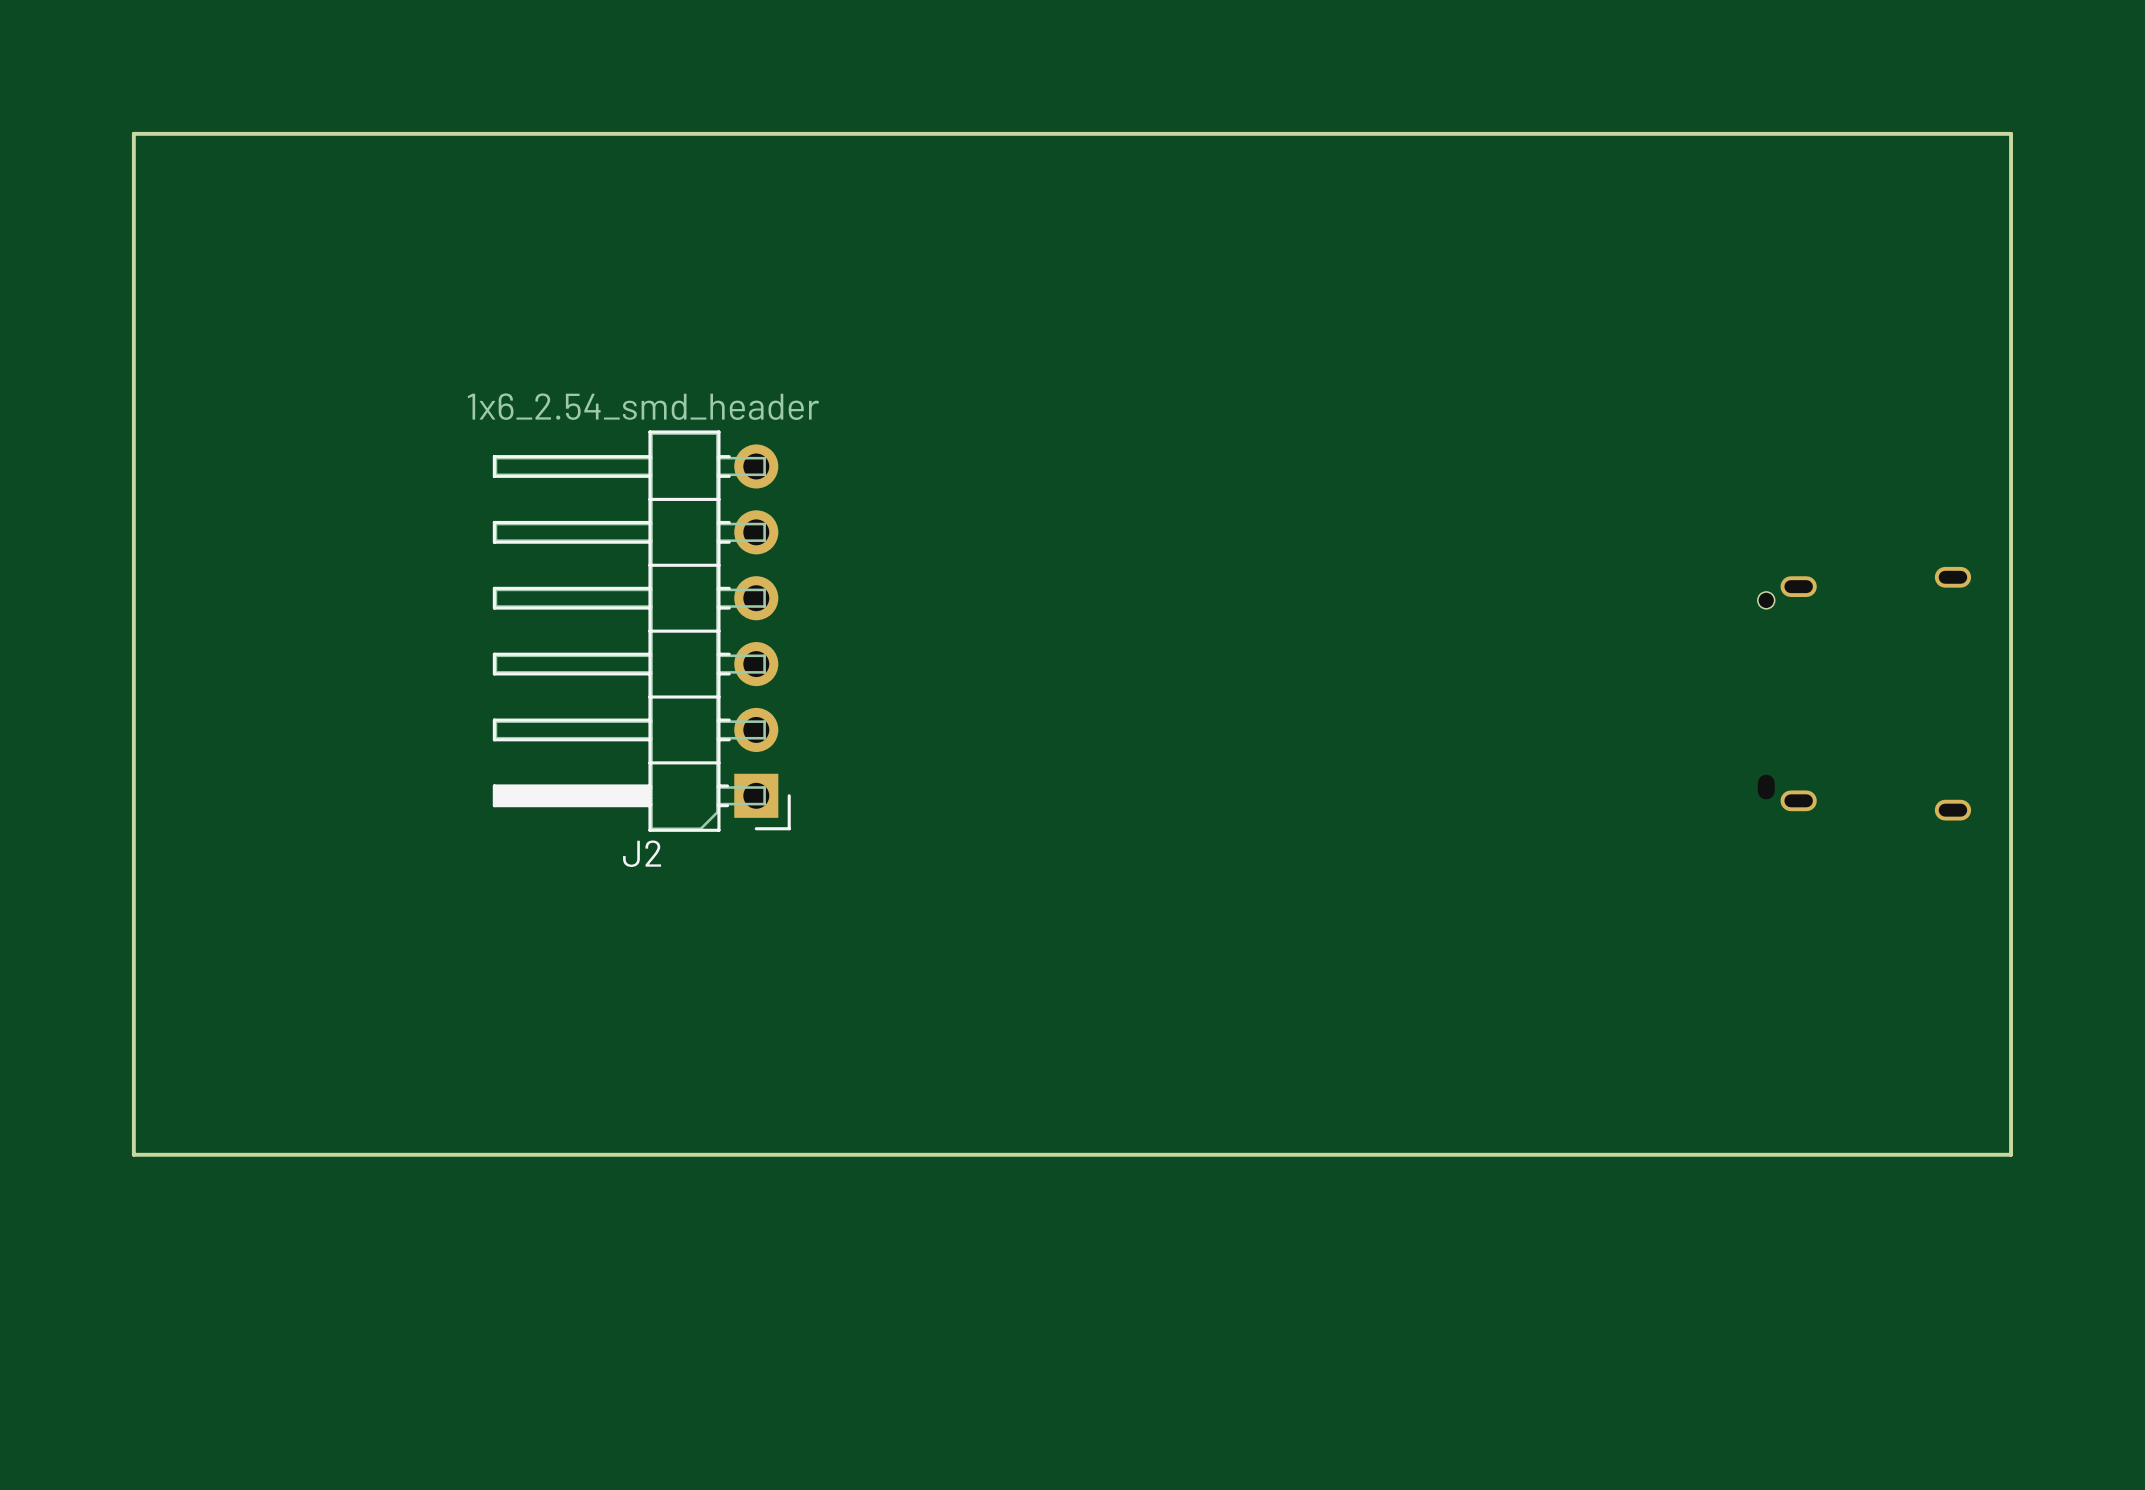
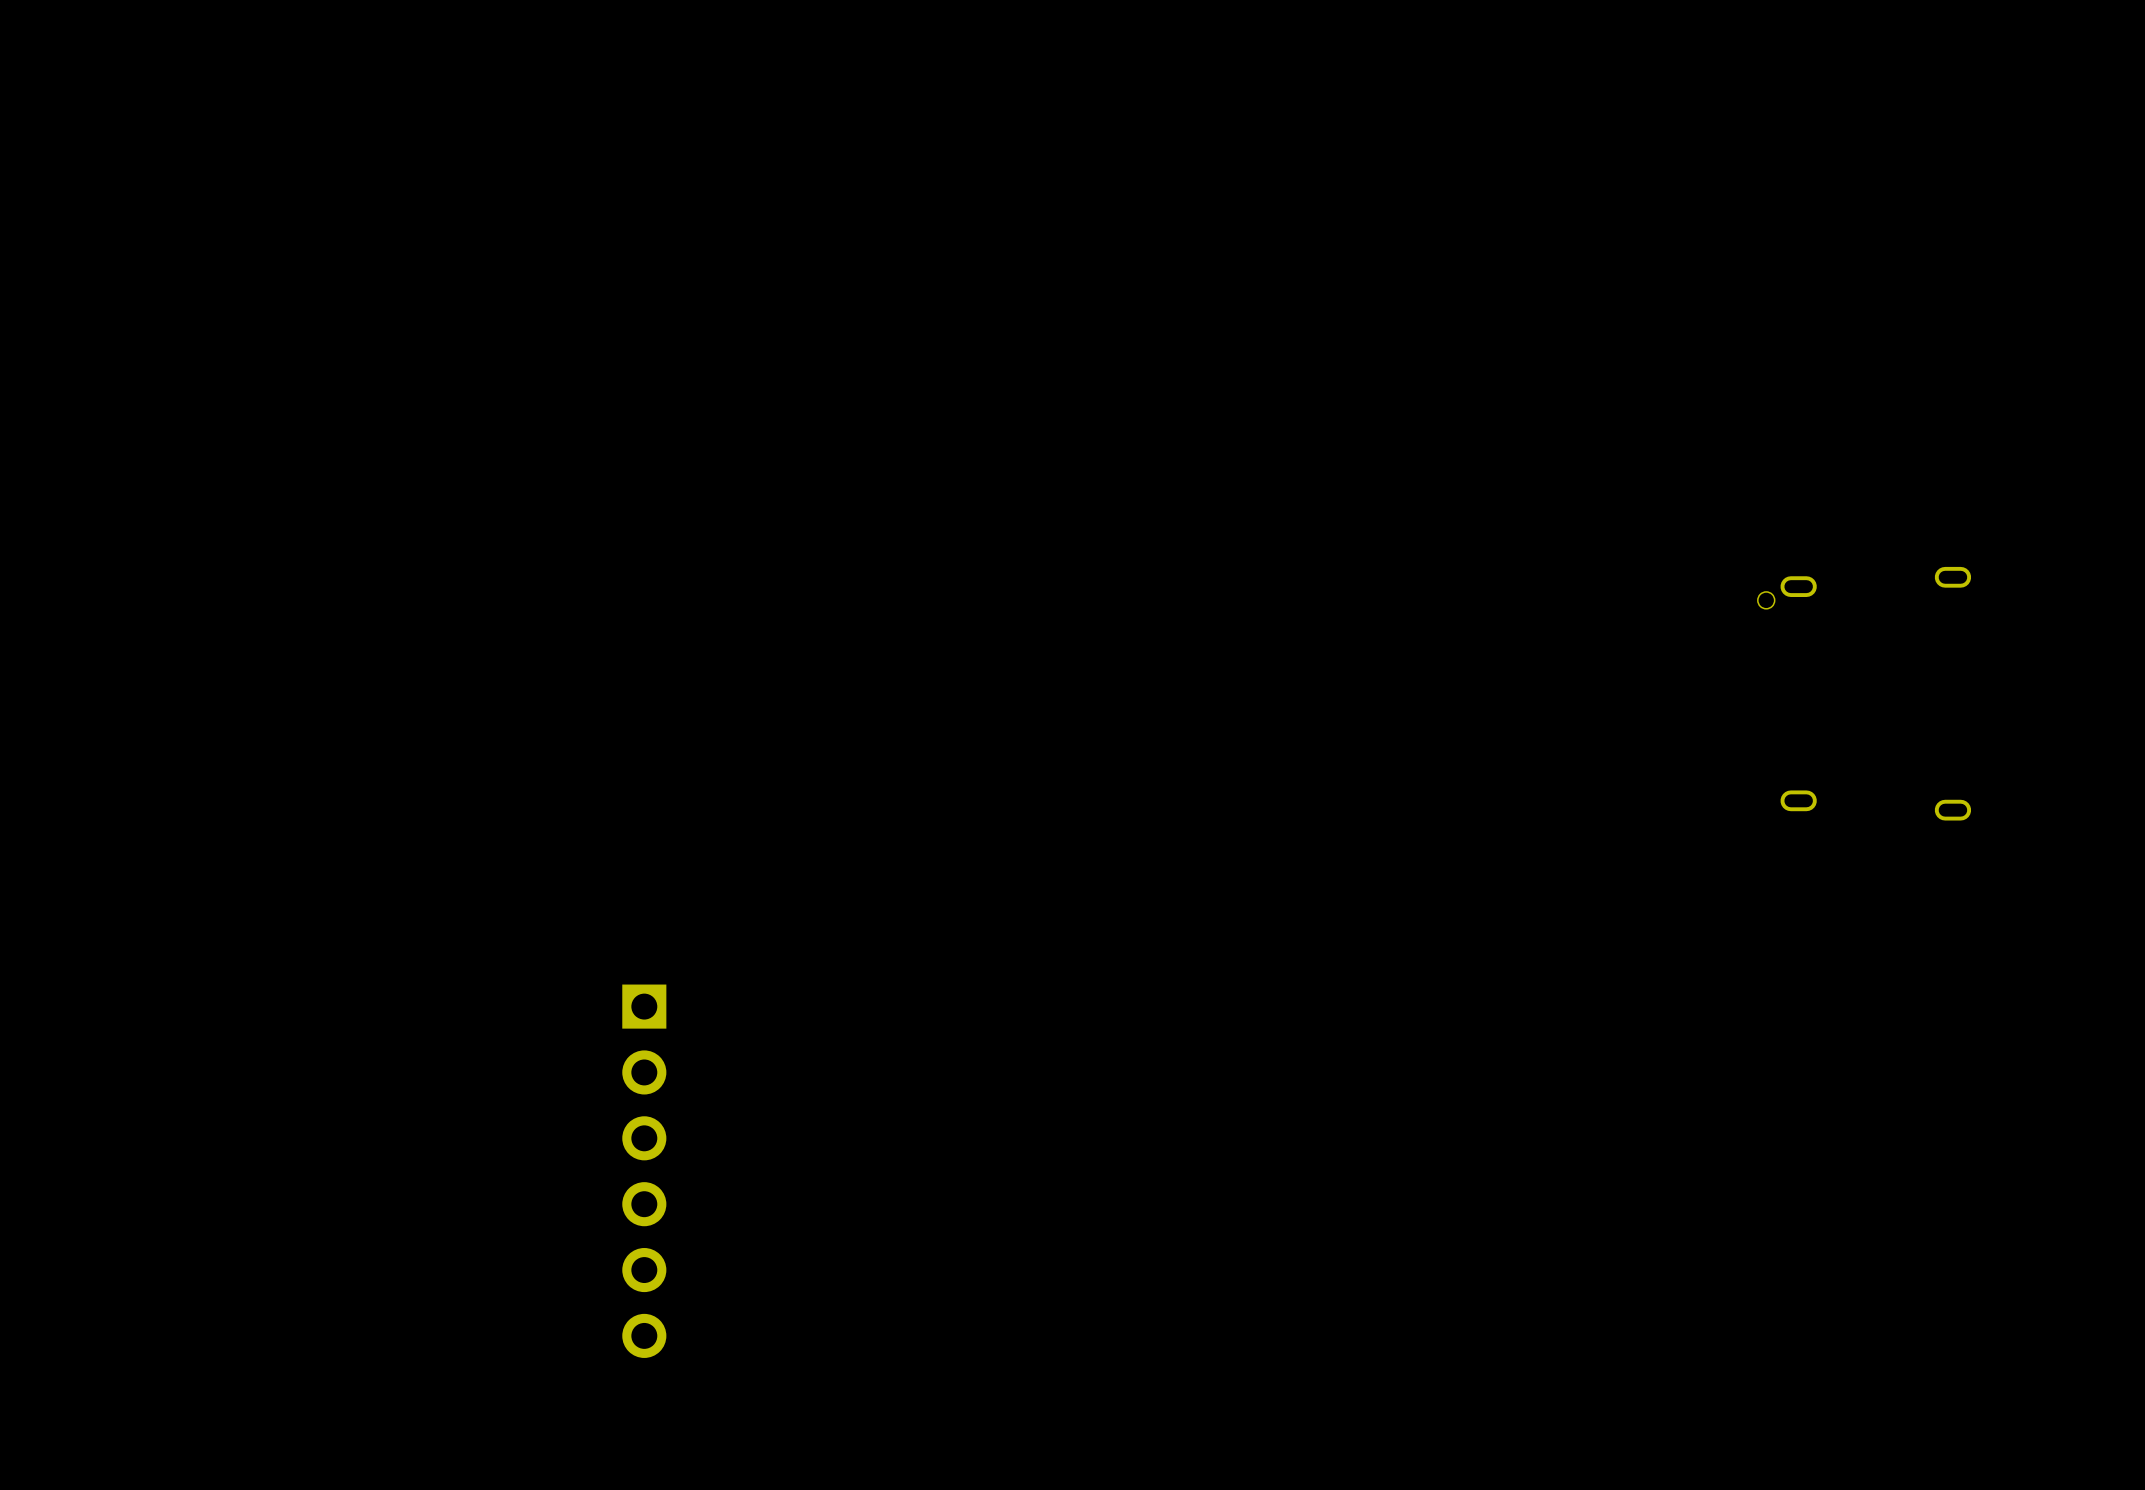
board edge: (2011, 133) (133, 133) (133, 1154) (2011, 1154) (2011, 133) -> none
J2 side: bottom (641, 631) -> top (644, 1171)

